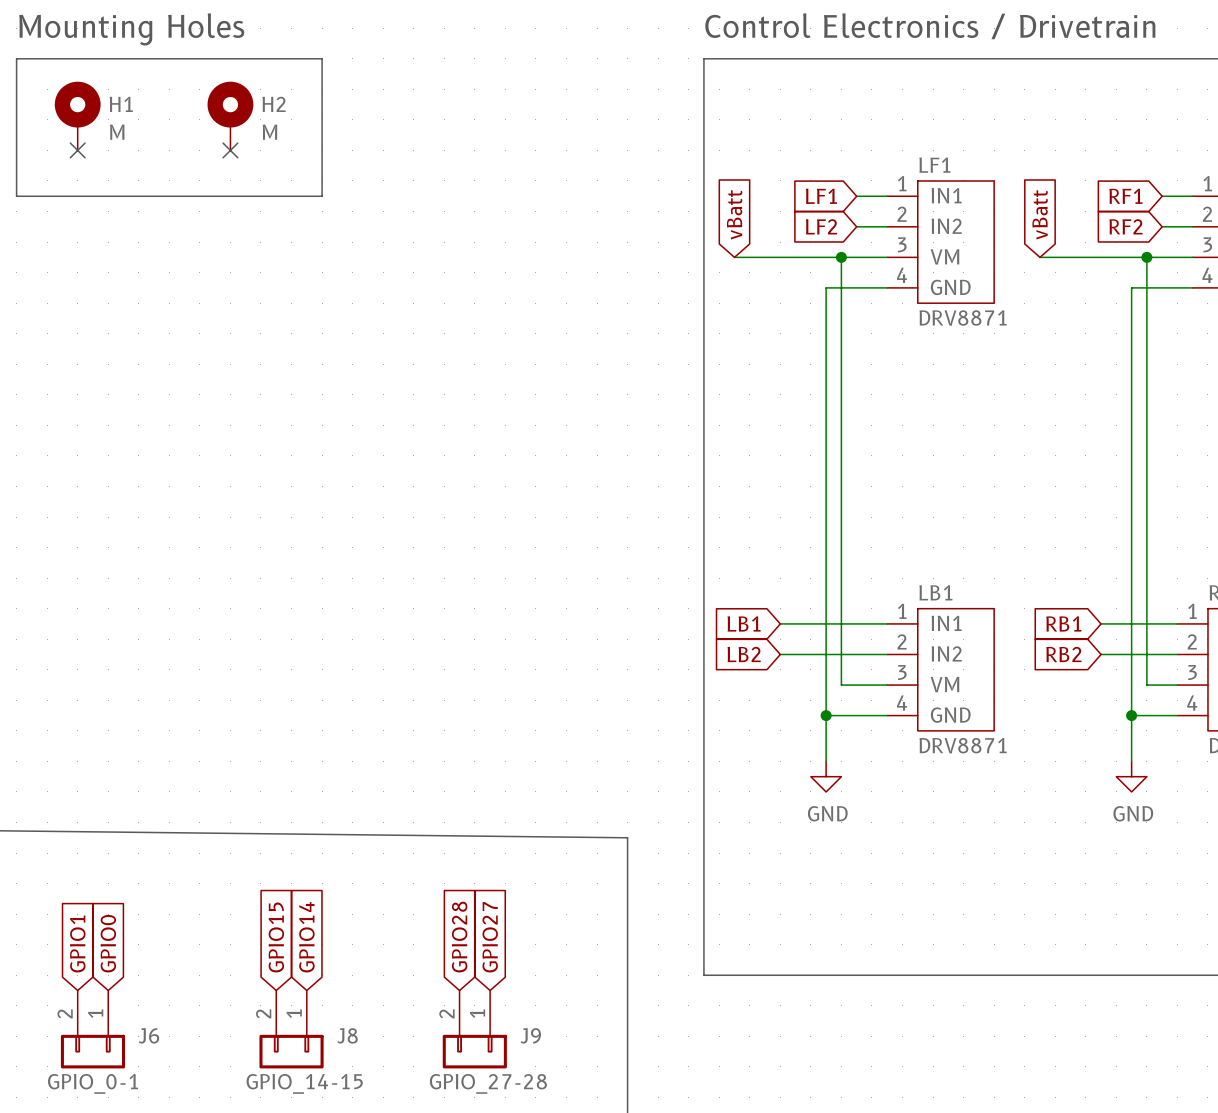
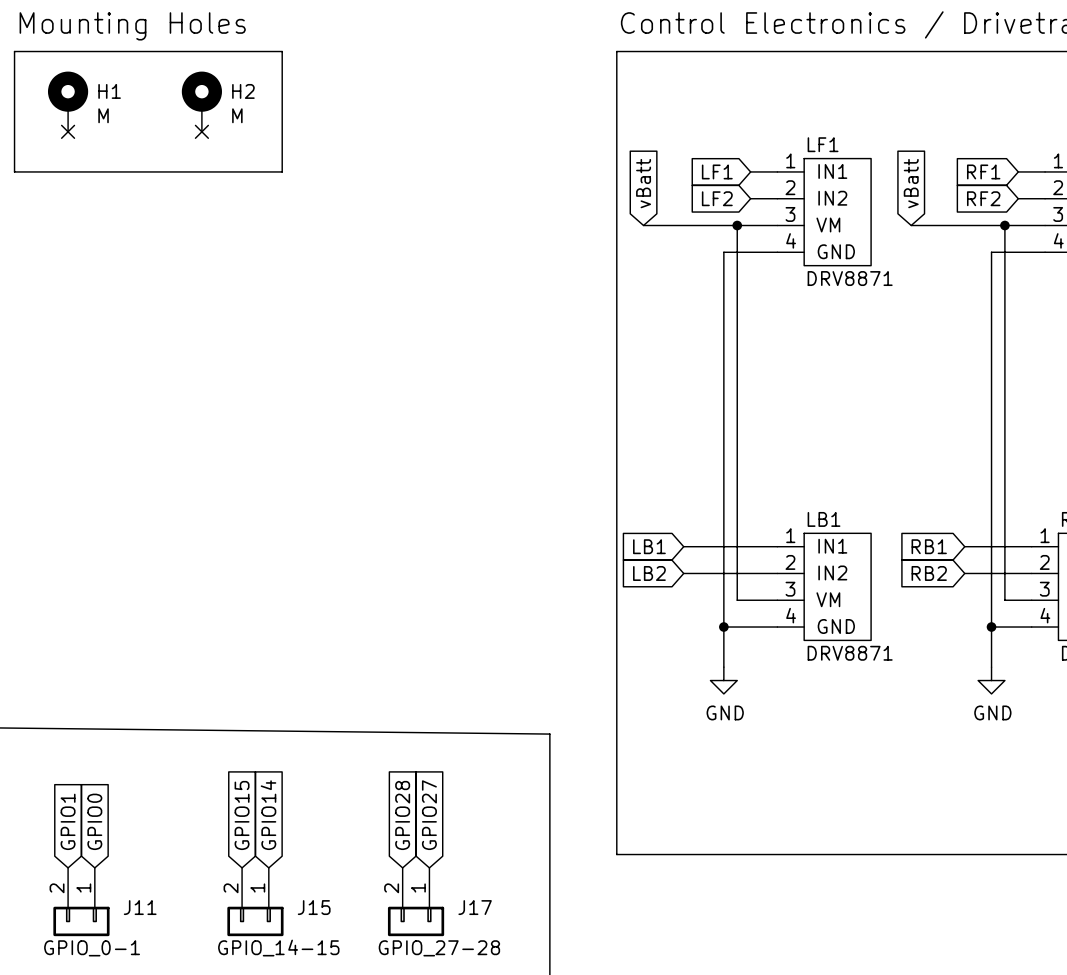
J6 name: J6 (148, 1035) -> J11 (140, 907)
J8 name: J8 (347, 1035) -> J15 (314, 907)
J9 name: J9 (530, 1035) -> J17 (475, 907)

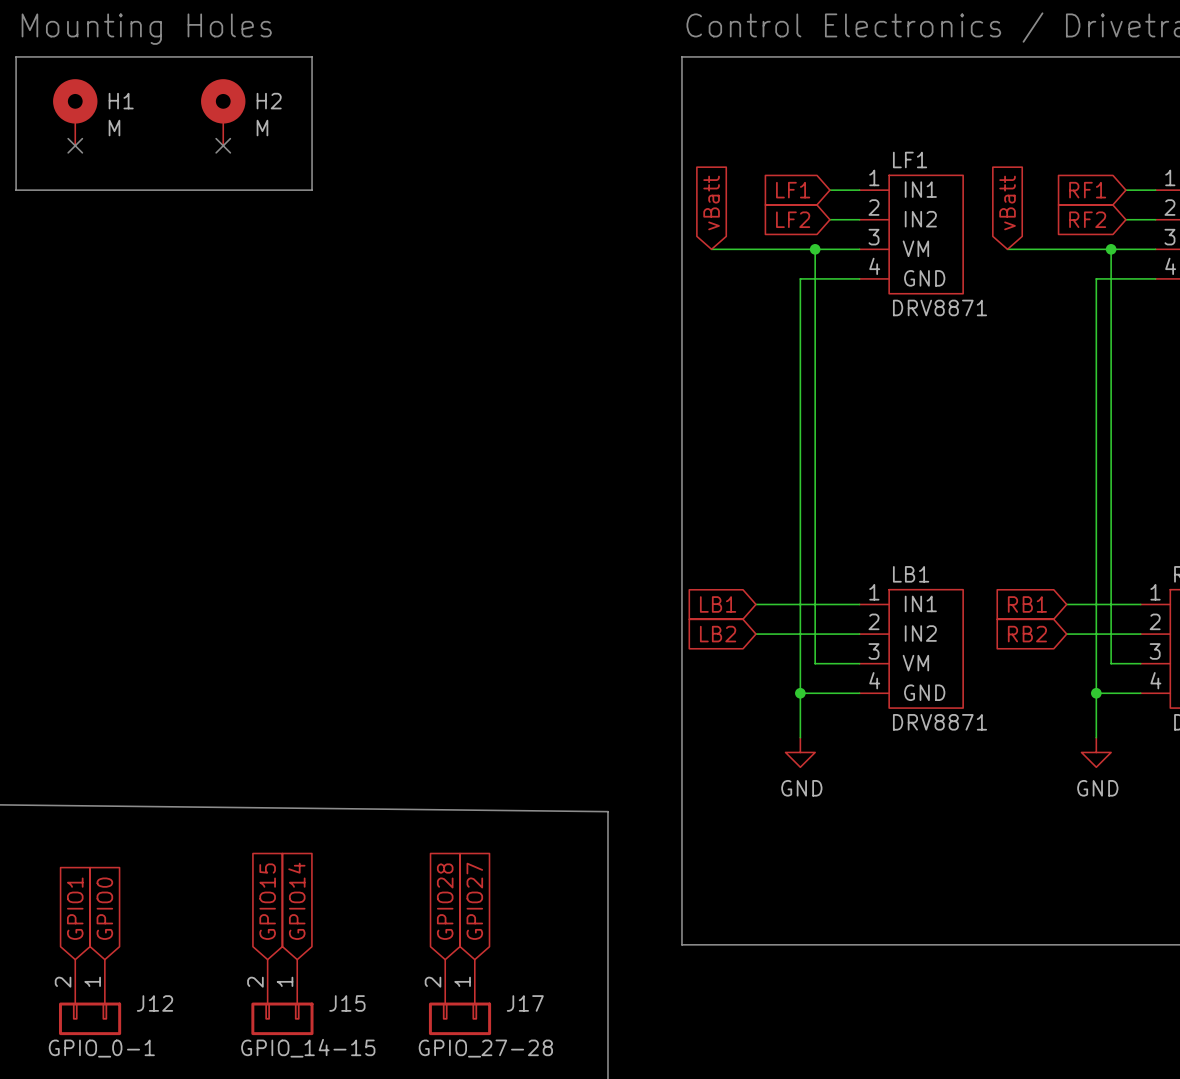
J11 name: J11 (140, 907) -> J12 (155, 1003)

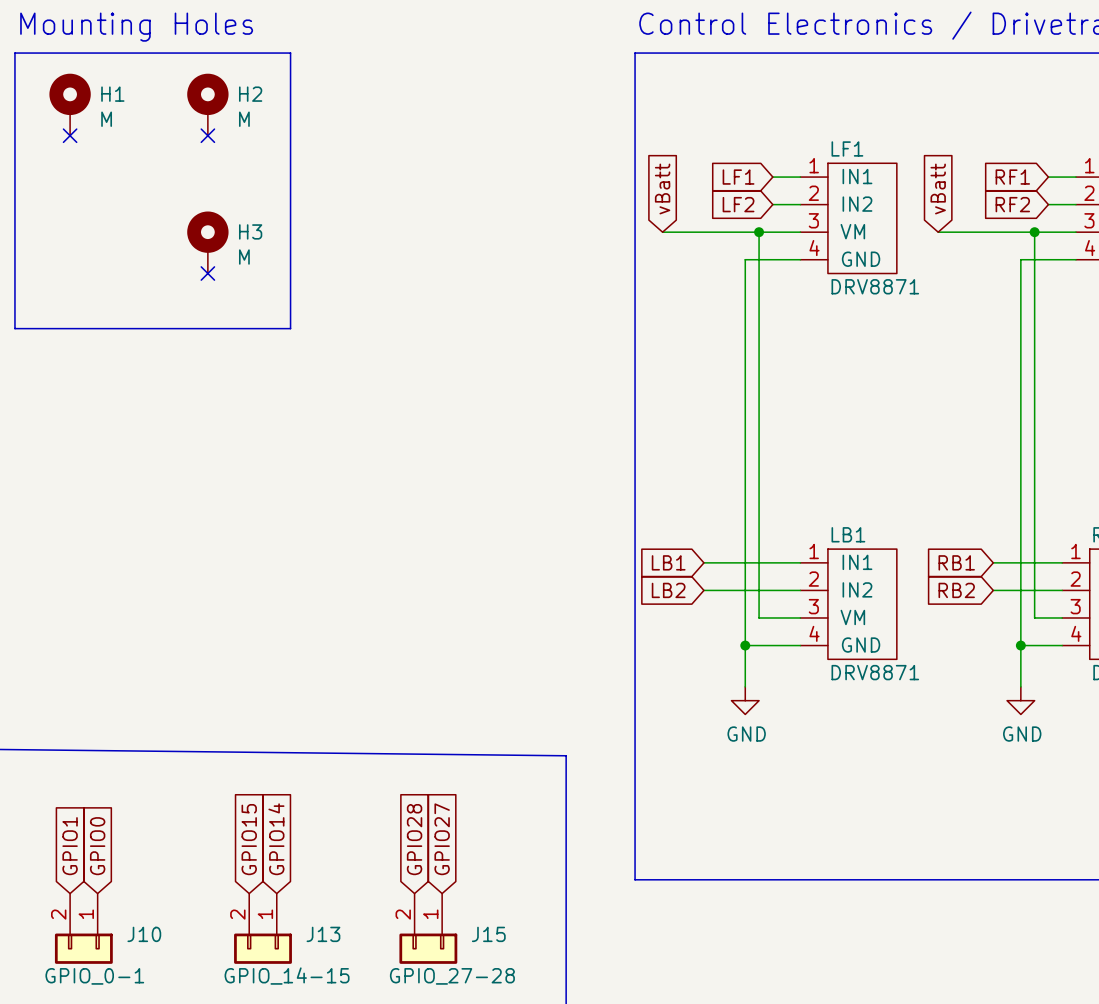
line: (16, 190) (312, 190) -> (14, 177) (14, 328) (290, 328) (290, 177)
H3: none -> M (207, 242)
no-connect mark: none -> (207, 273)
J12 name: J12 (155, 1003) -> J10 (144, 934)
J15 name: J15 (347, 1003) -> J13 (323, 934)
J17 name: J17 (525, 1003) -> J15 (488, 934)

